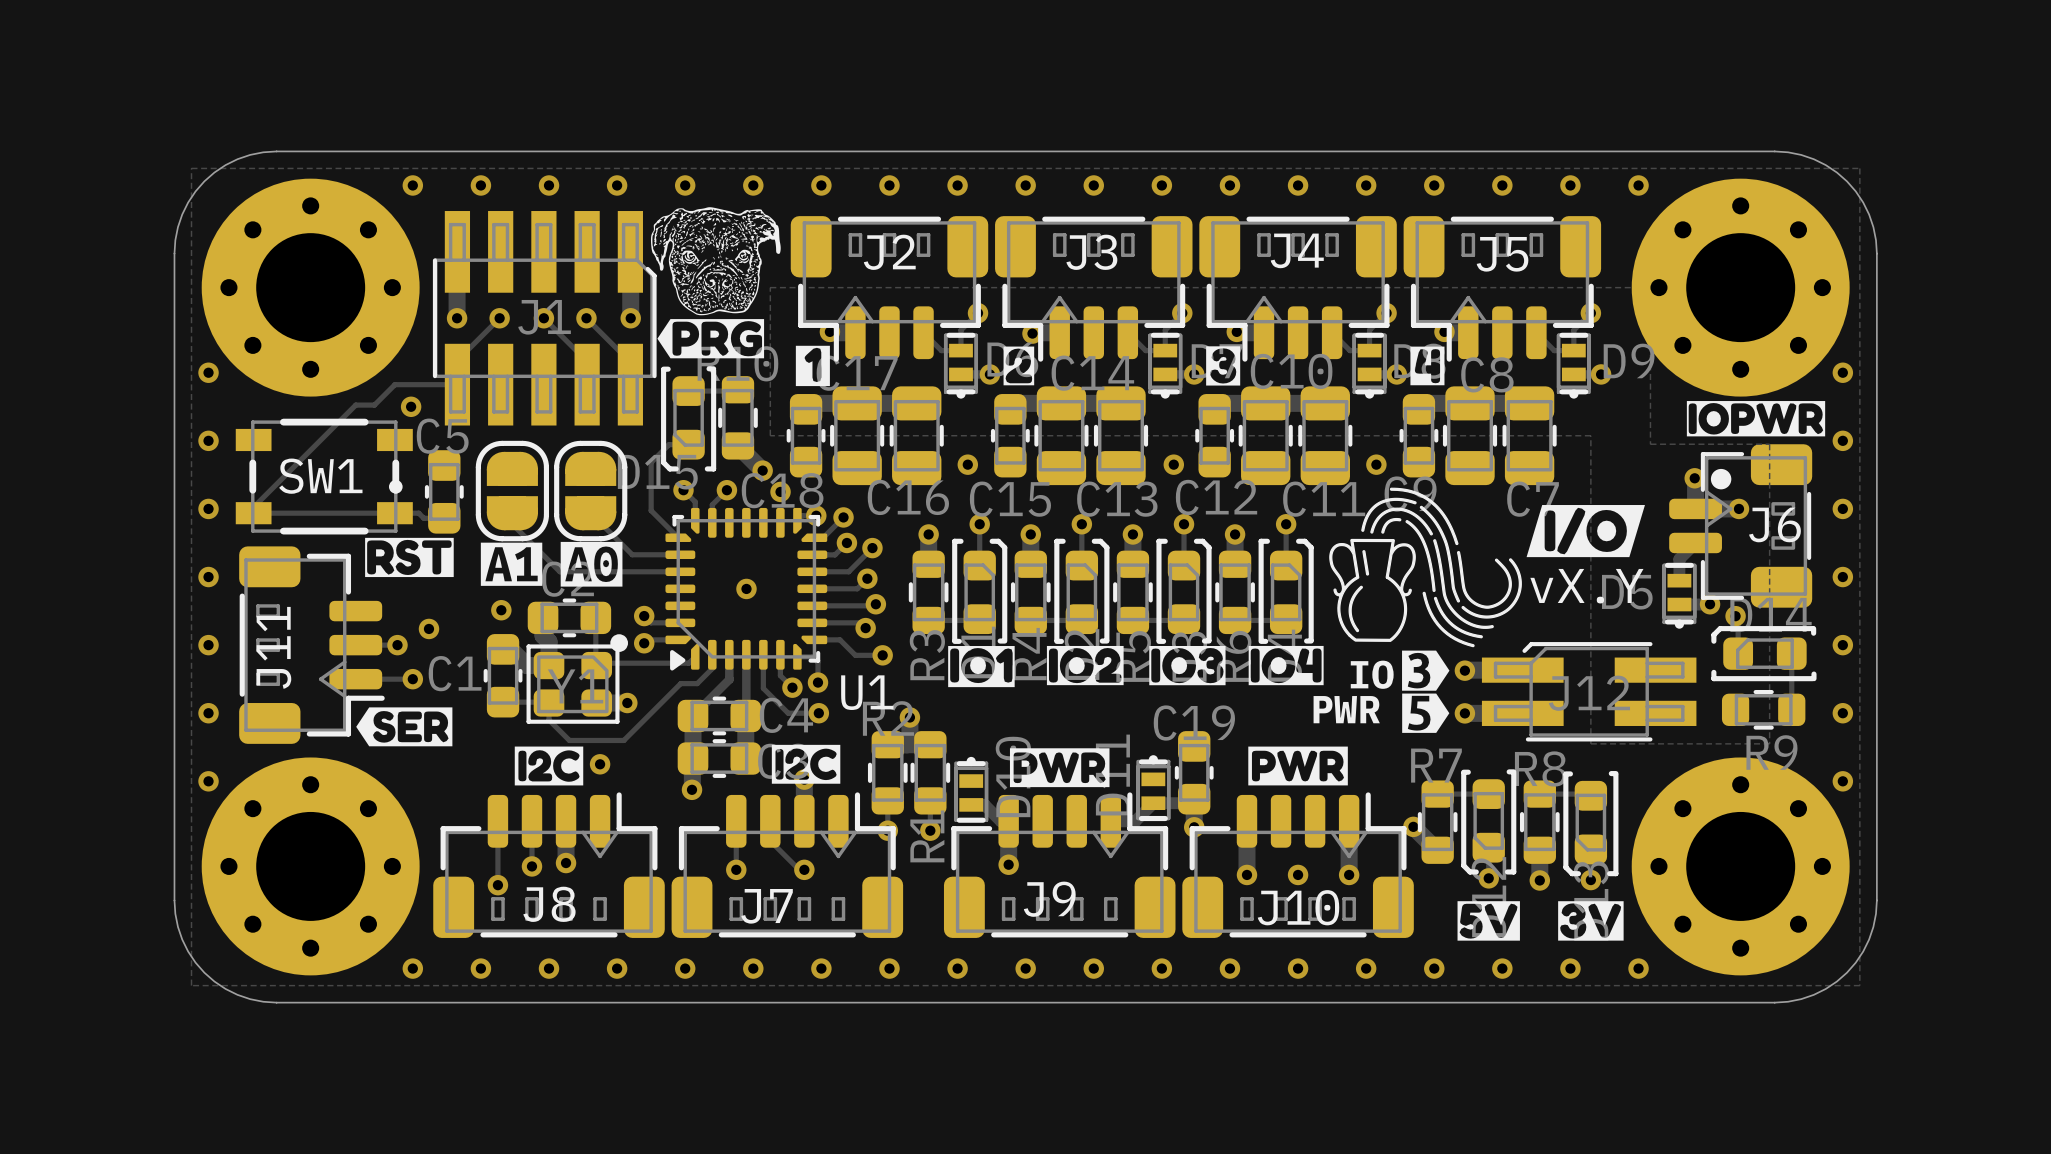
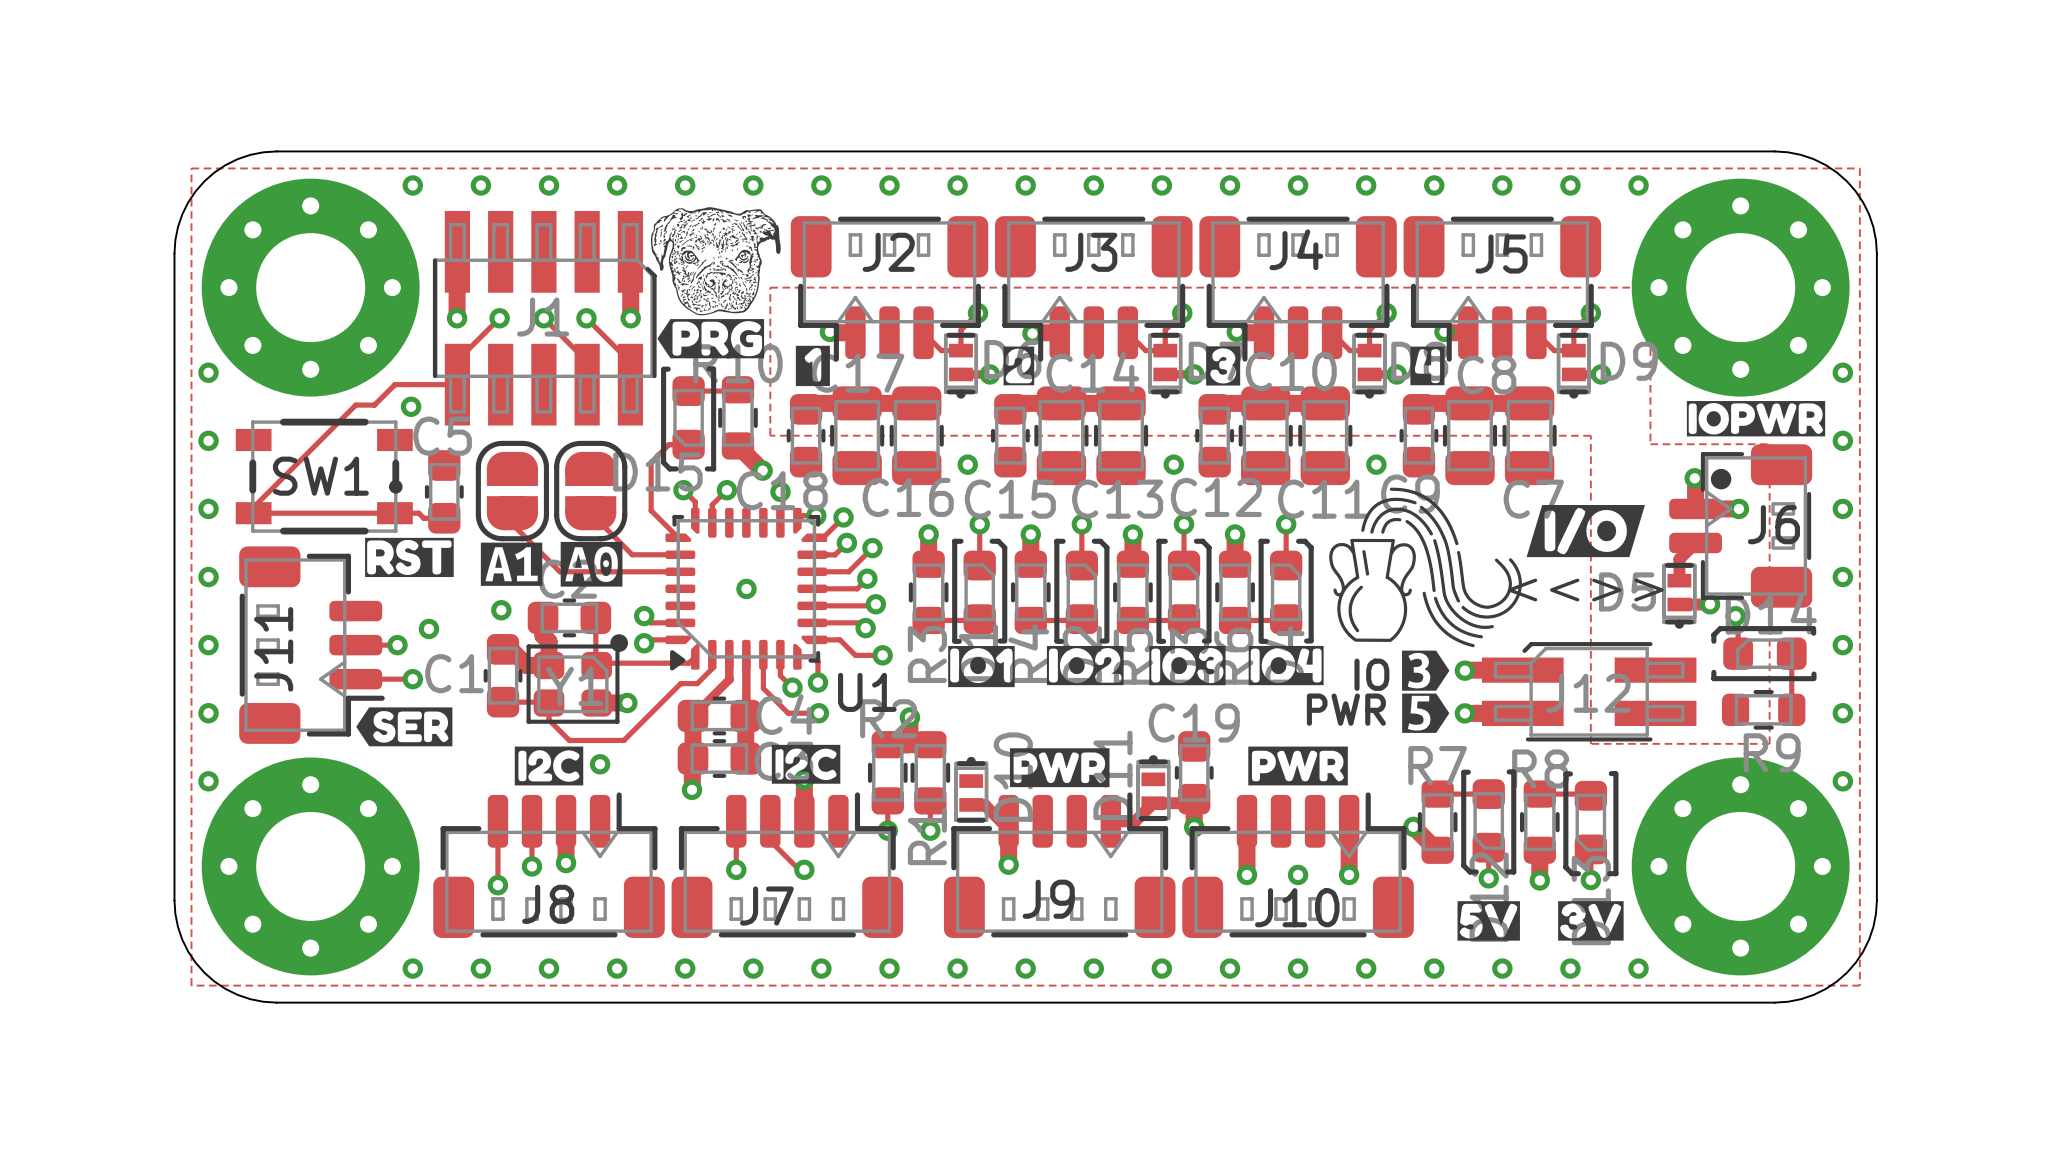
text: vX.Y (1586, 586) -> <<>> (1585, 590)

